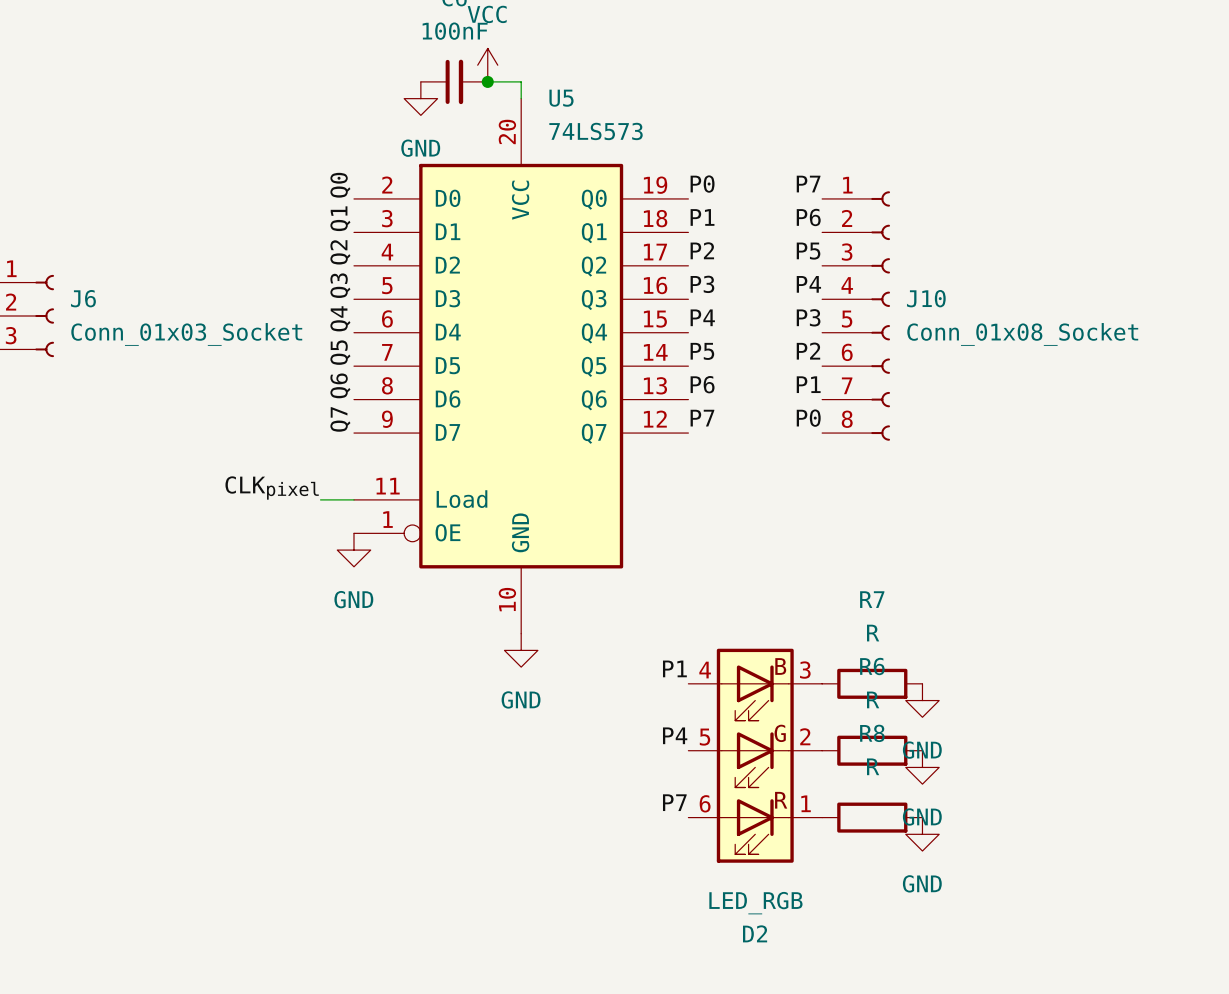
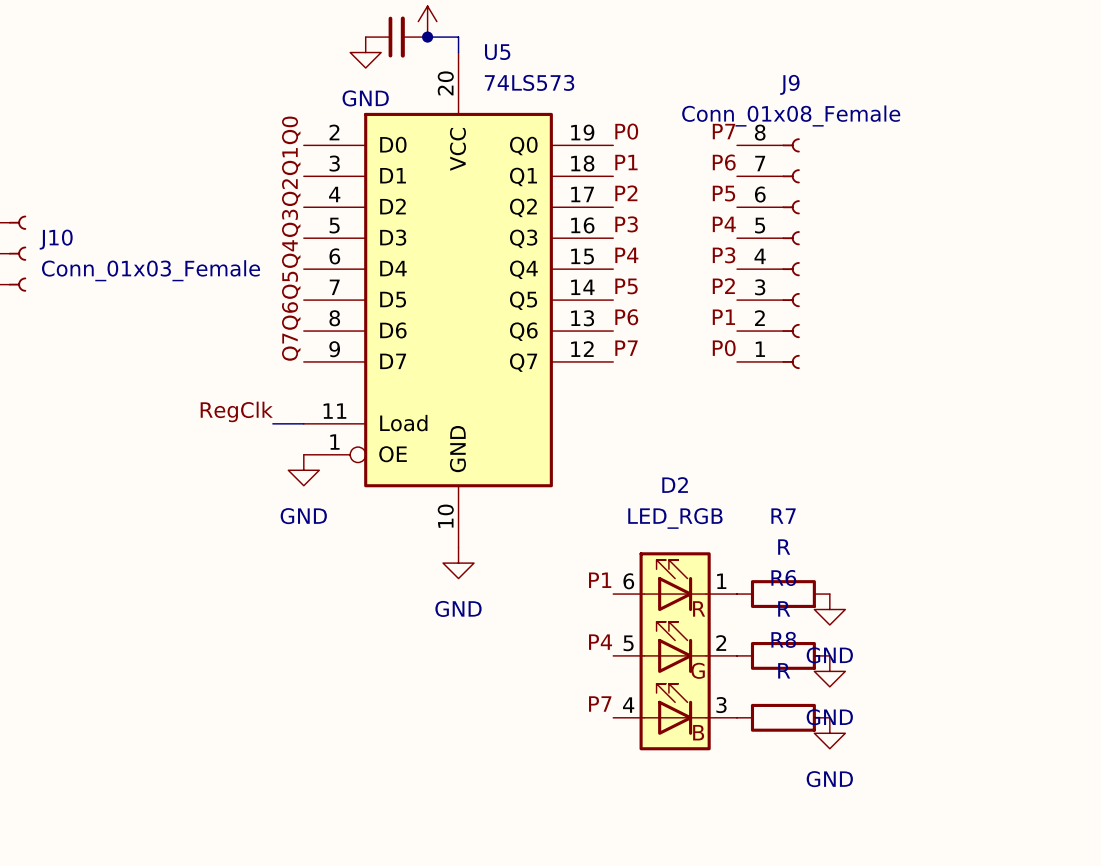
J6 name: J6 (83, 298) -> J10 (56, 239)
J10: Conn_01x08_Socket (856, 316) -> none
J9: none -> Conn_01x08_Female (768, 253)
J6 value: Conn_01x03_Socket (186, 334) -> Conn_01x03_Female (151, 270)
label: CLKpixel (272, 488) -> RegClk (236, 411)
D2 flip: as is (755, 755) -> up-down (675, 651)

